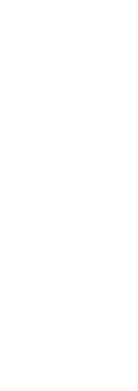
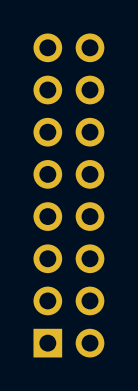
part: none -> (68, 195)

